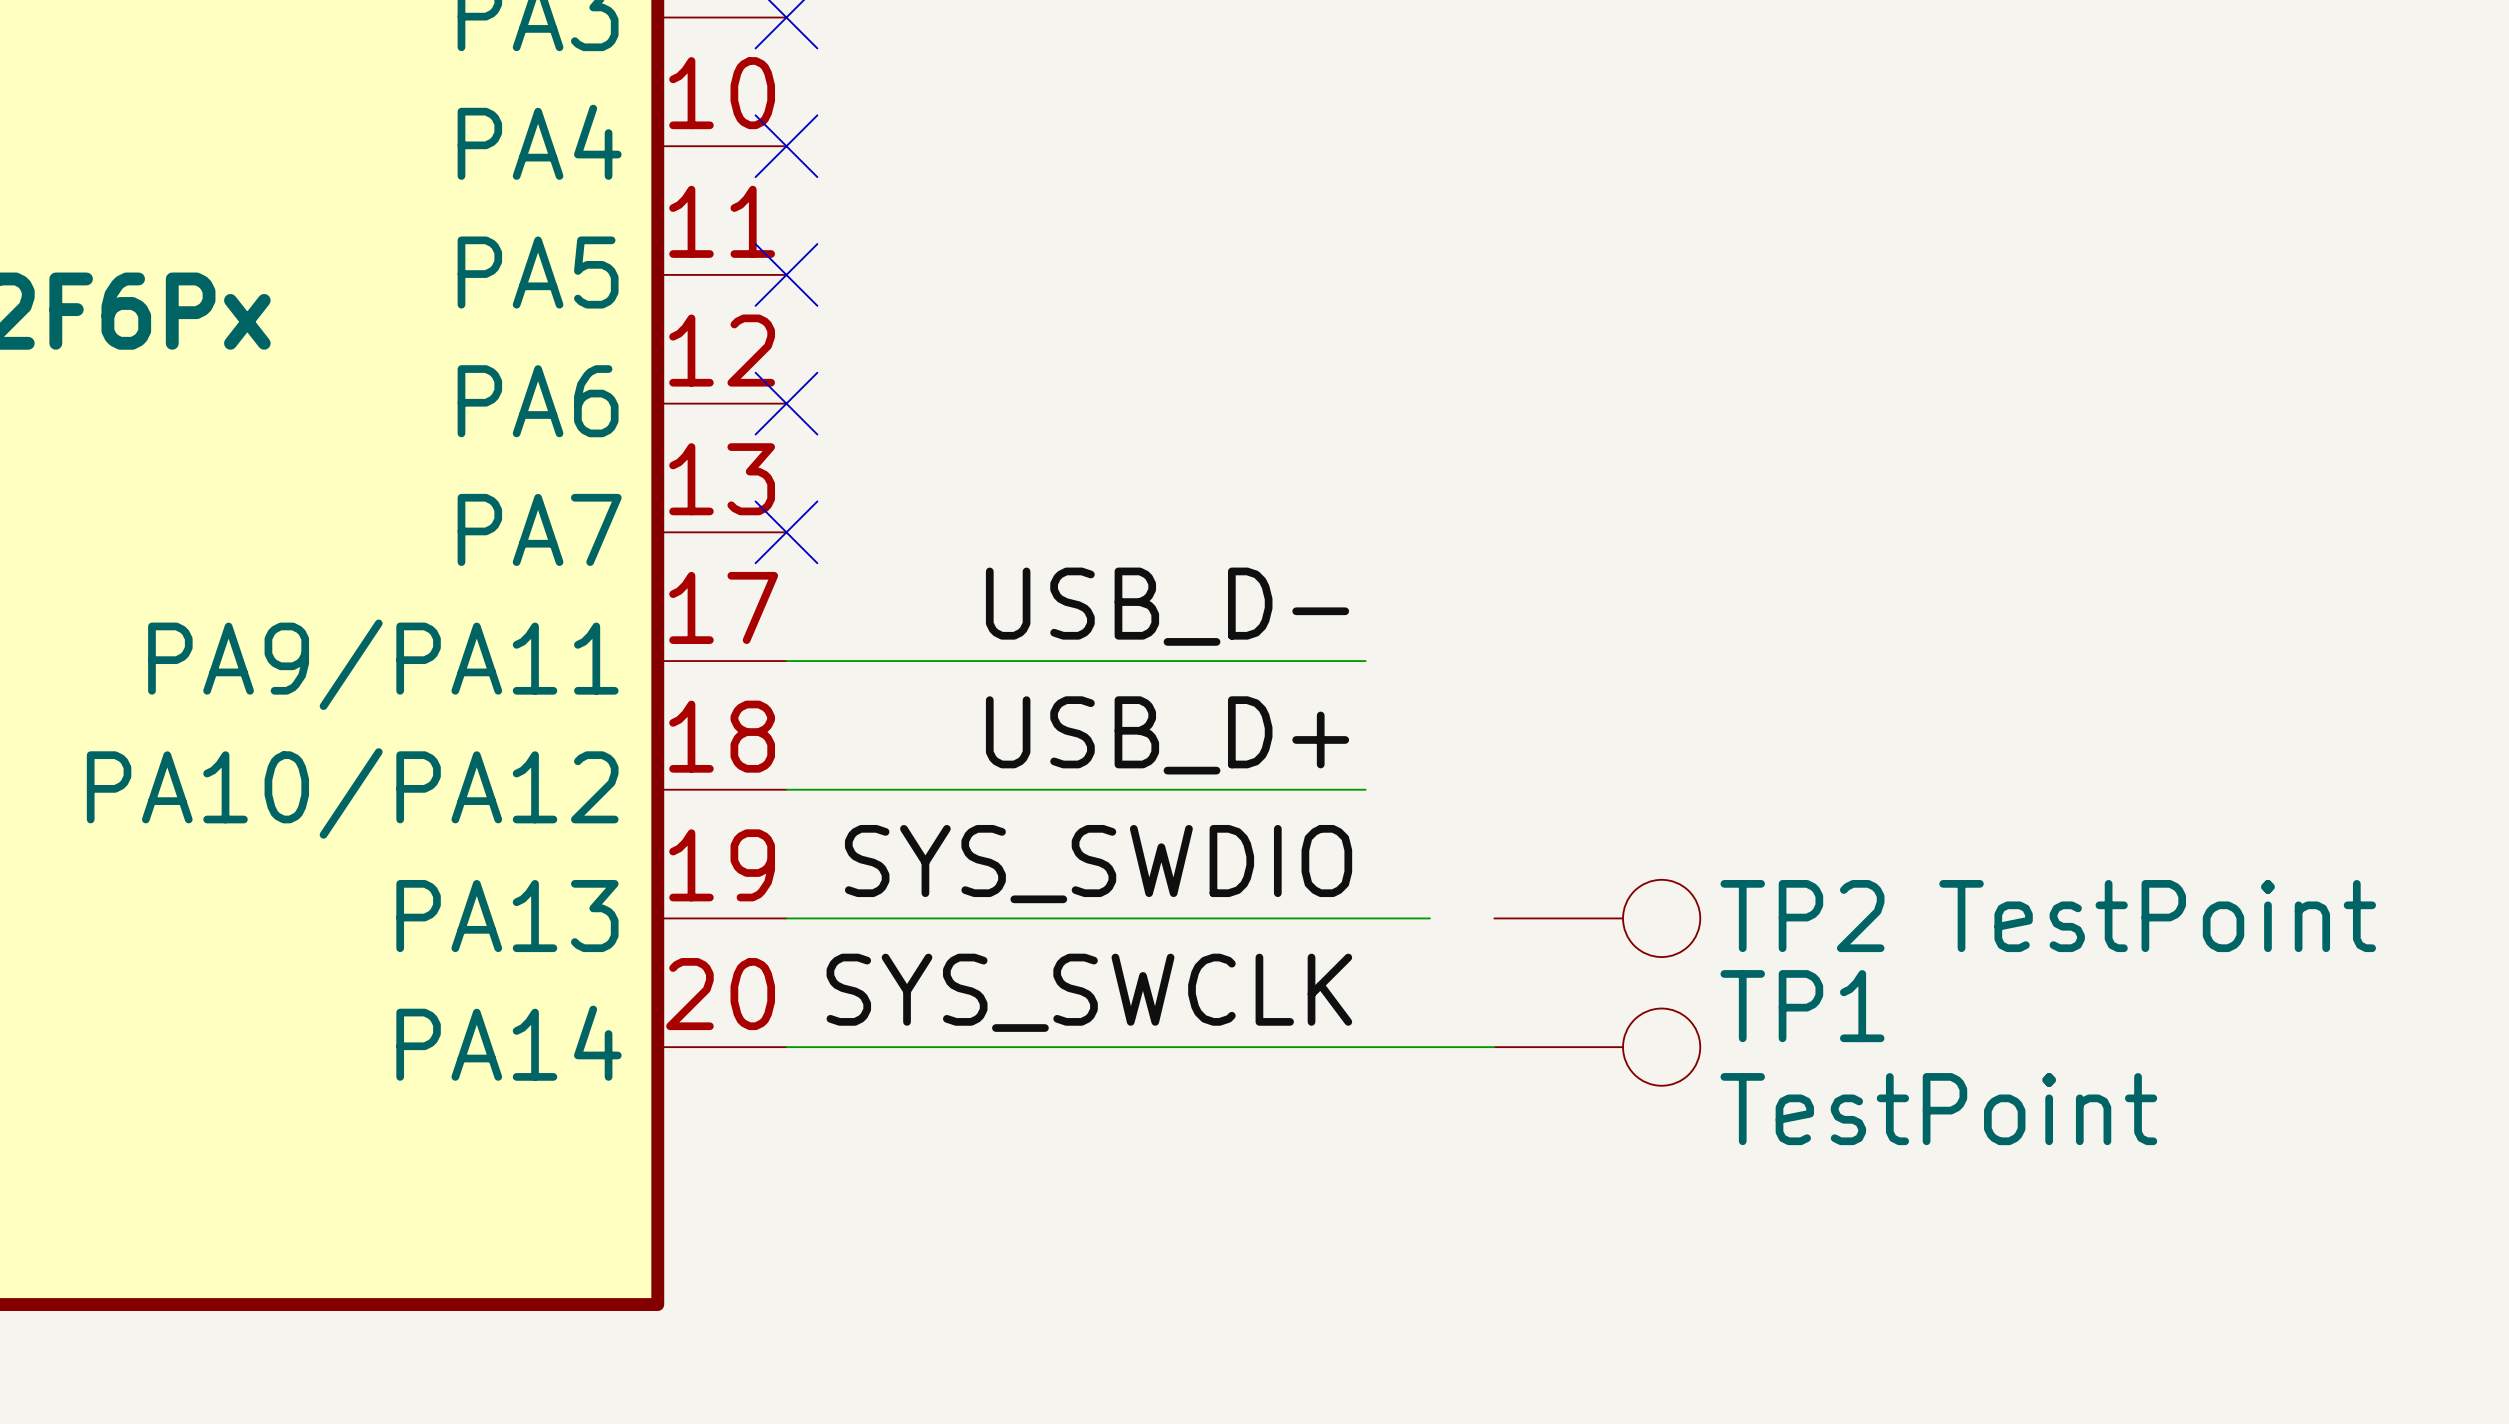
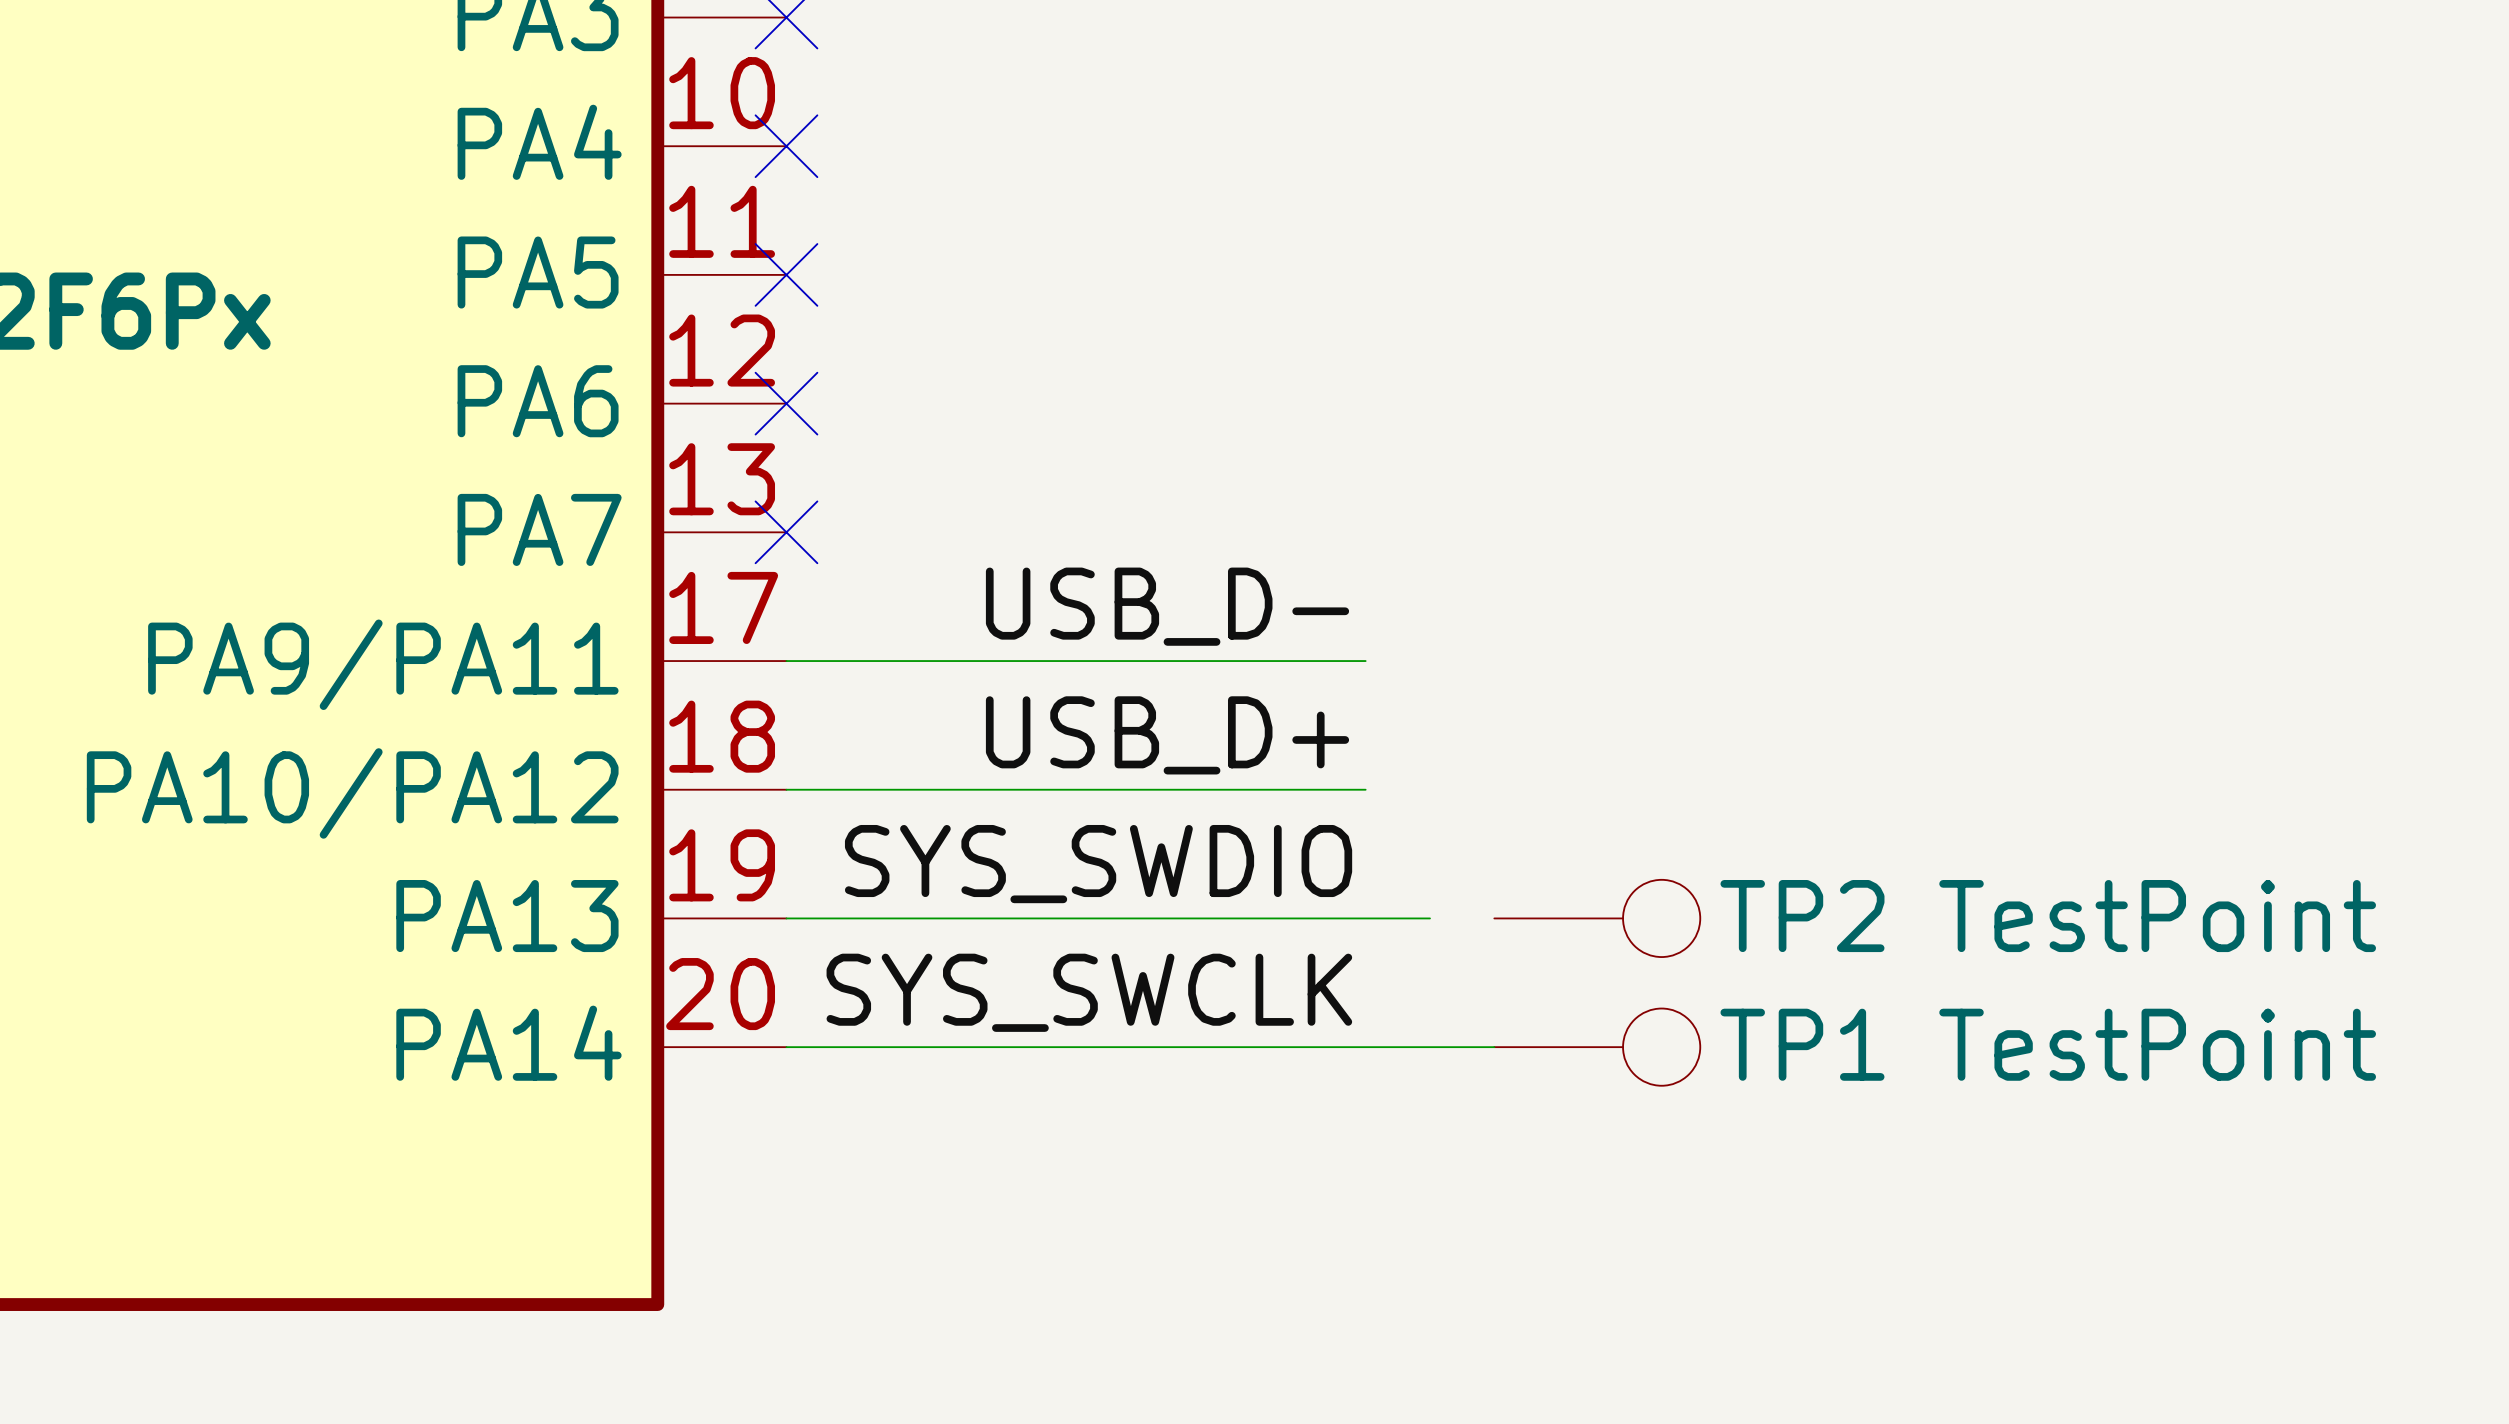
TP1 name position: TP1 (1802, 1006) -> TP1 (1802, 1044)
TP1 value position: TestPoint (1938, 1109) -> TestPoint (2157, 1044)

